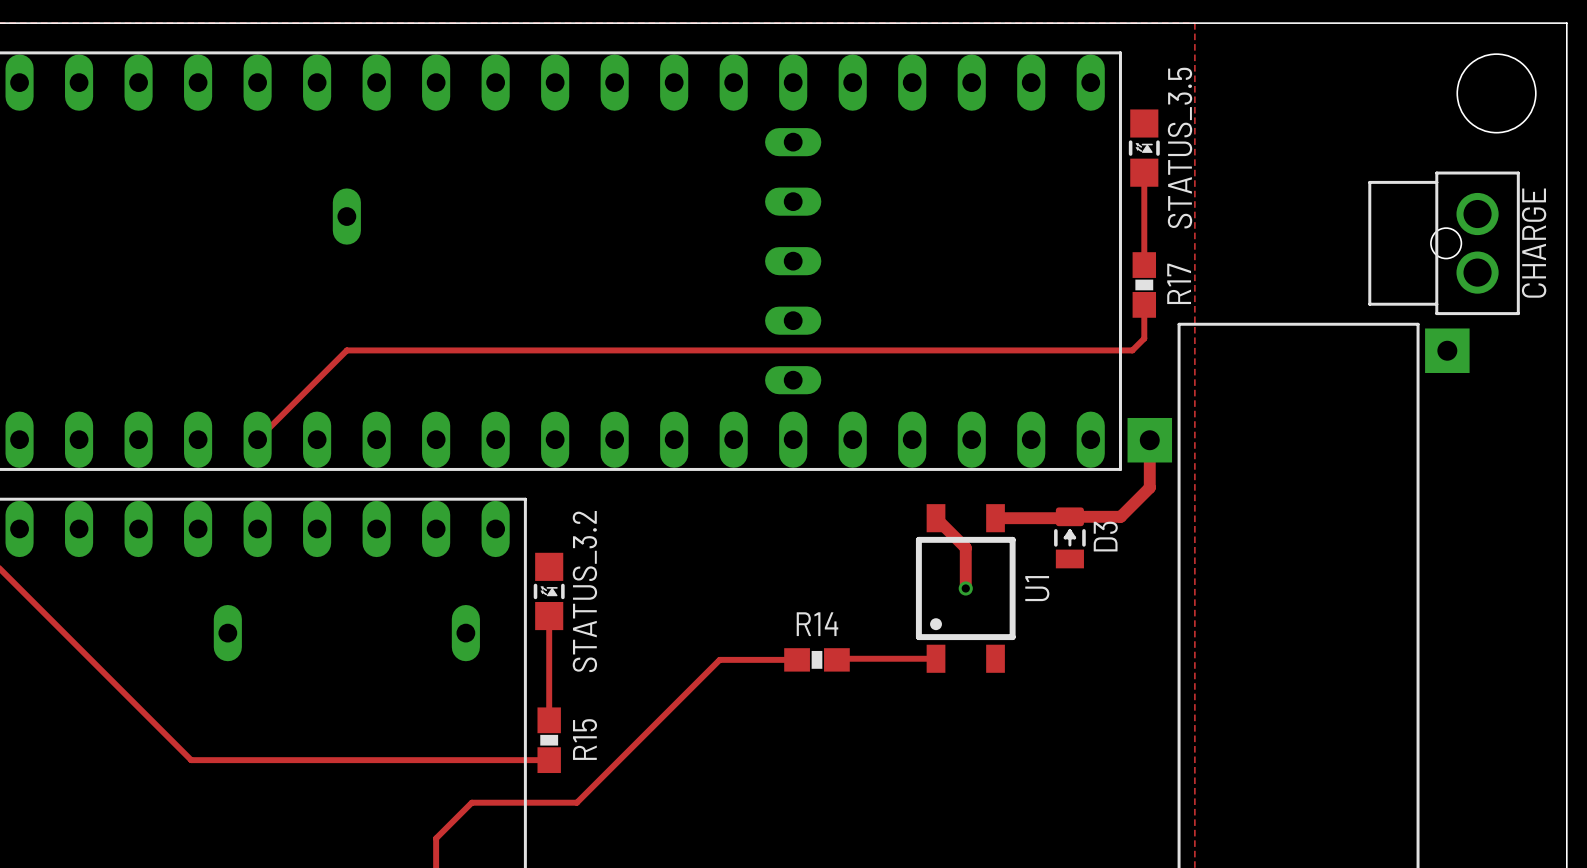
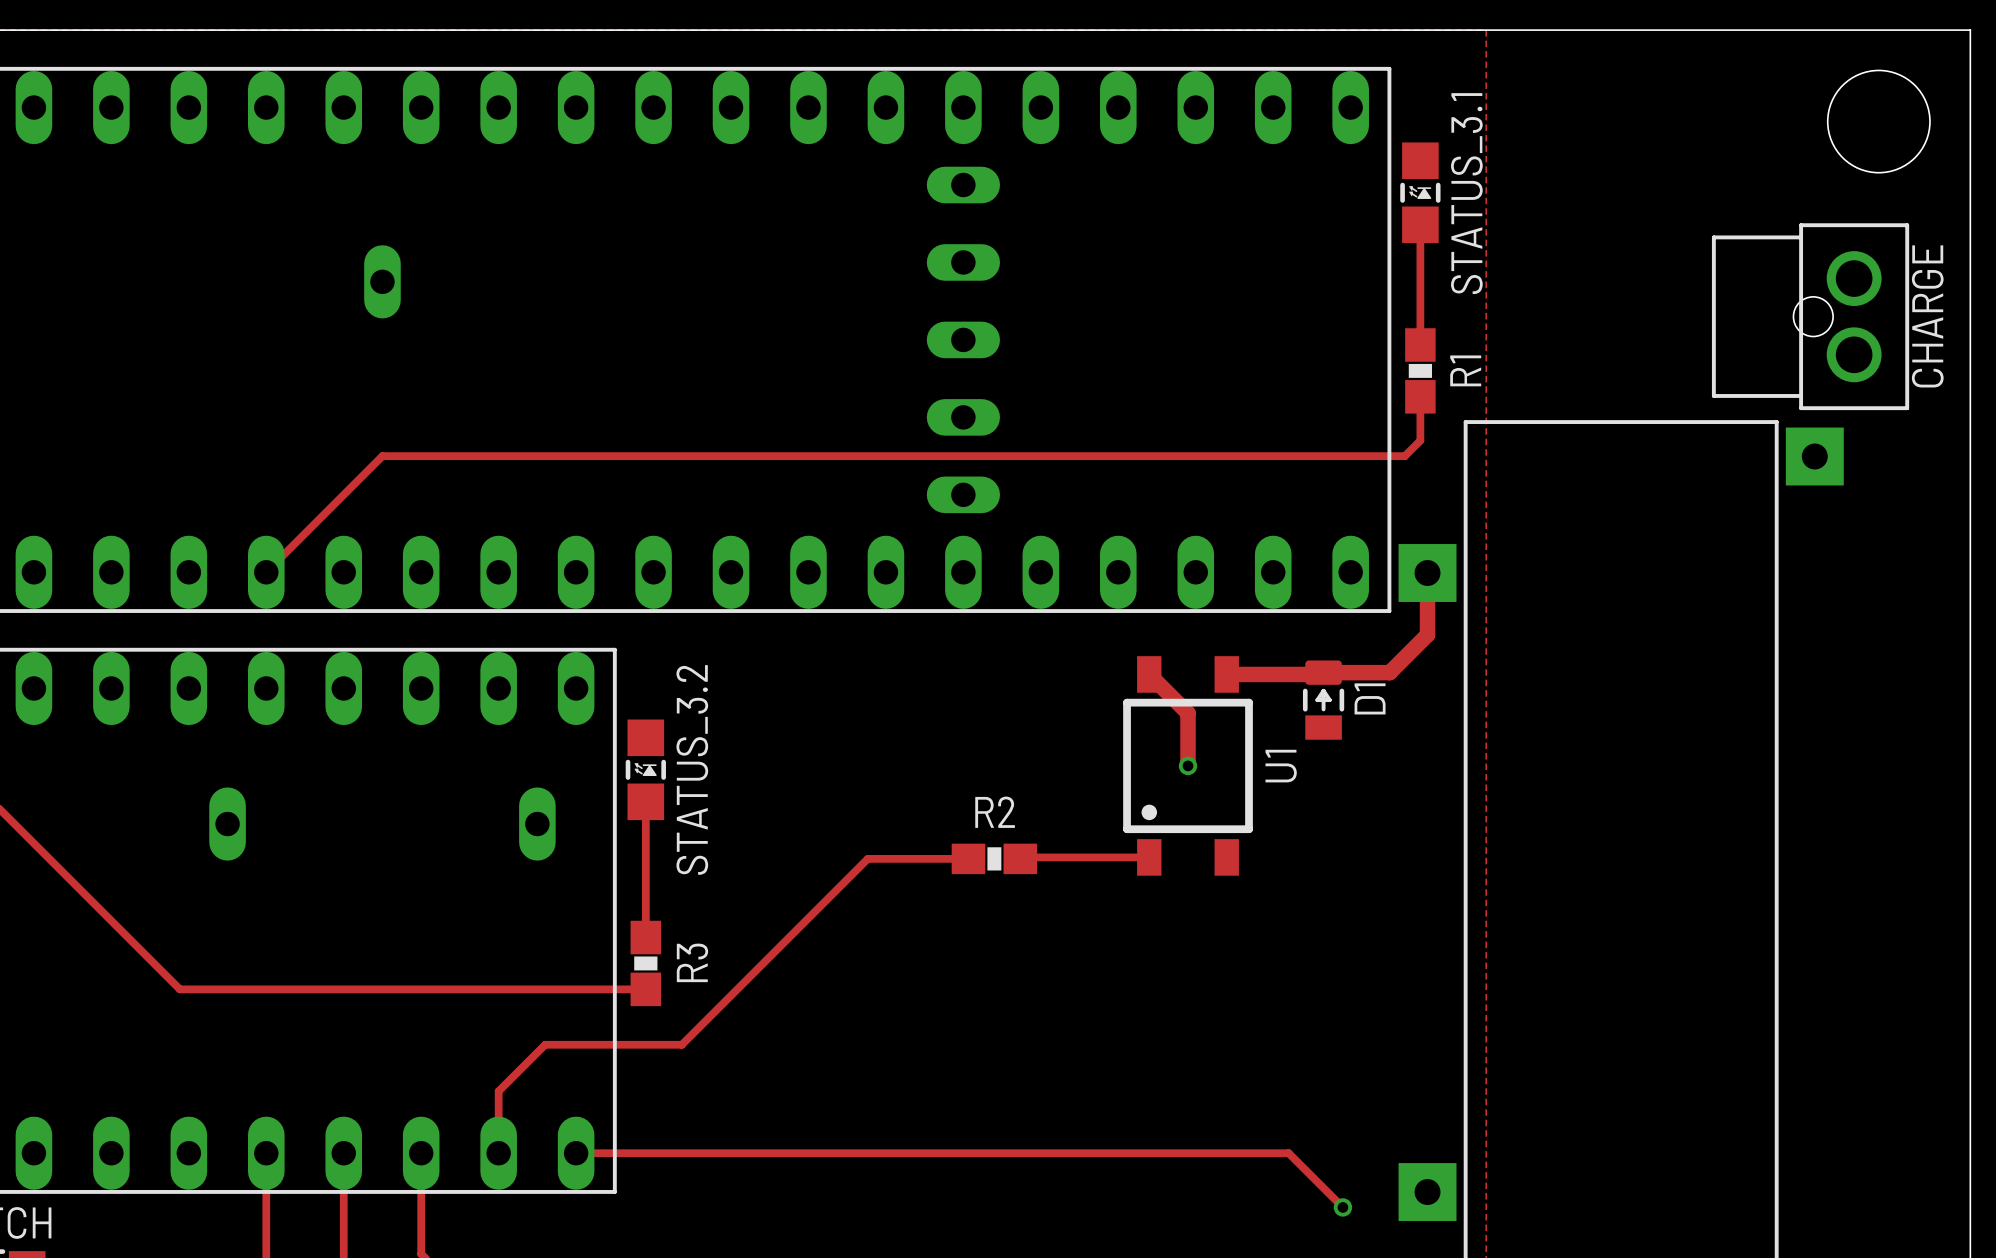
STATUS_3.5 name: STATUS_3.5 (1180, 148) -> STATUS_3.1 (1466, 193)
R17 name: R17 (1179, 283) -> R1 (1465, 370)
D3 name: D3 (1105, 536) -> D1 (1370, 698)
R14 name: R14 (817, 624) -> R2 (995, 812)
R15 name: R15 (585, 739) -> R3 (692, 962)

